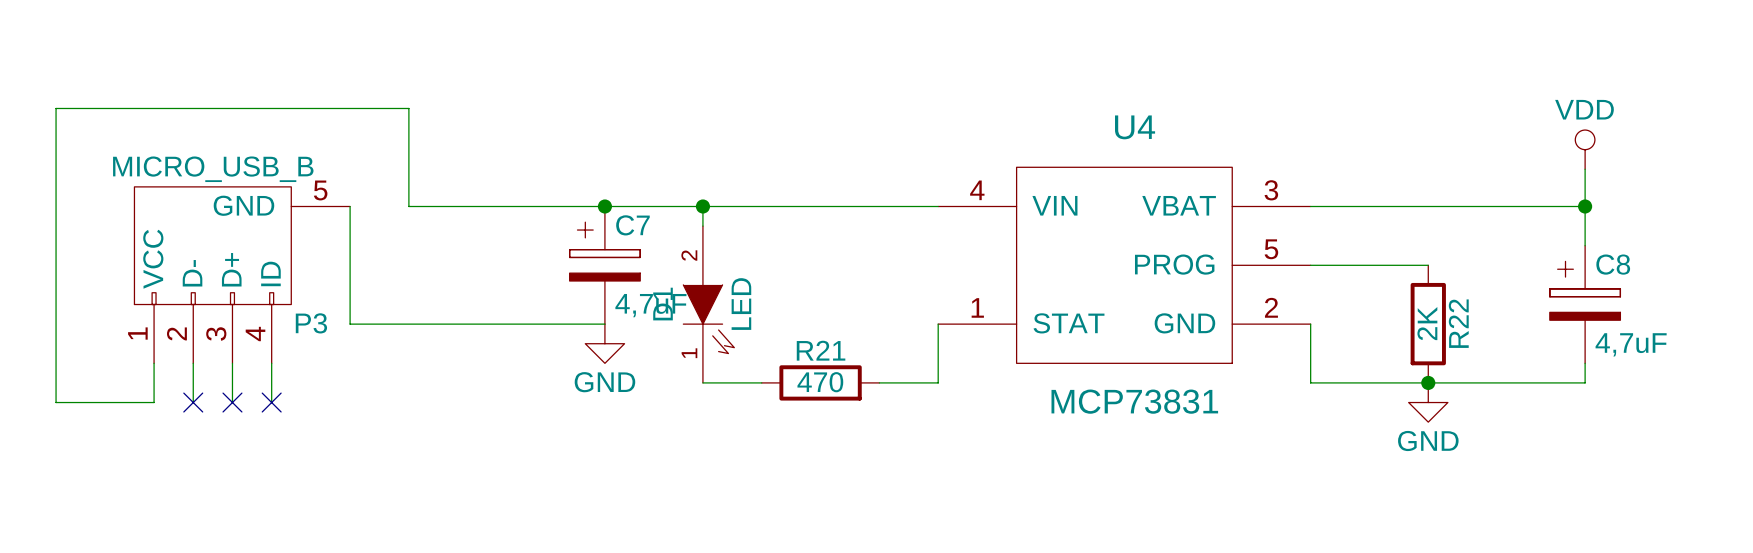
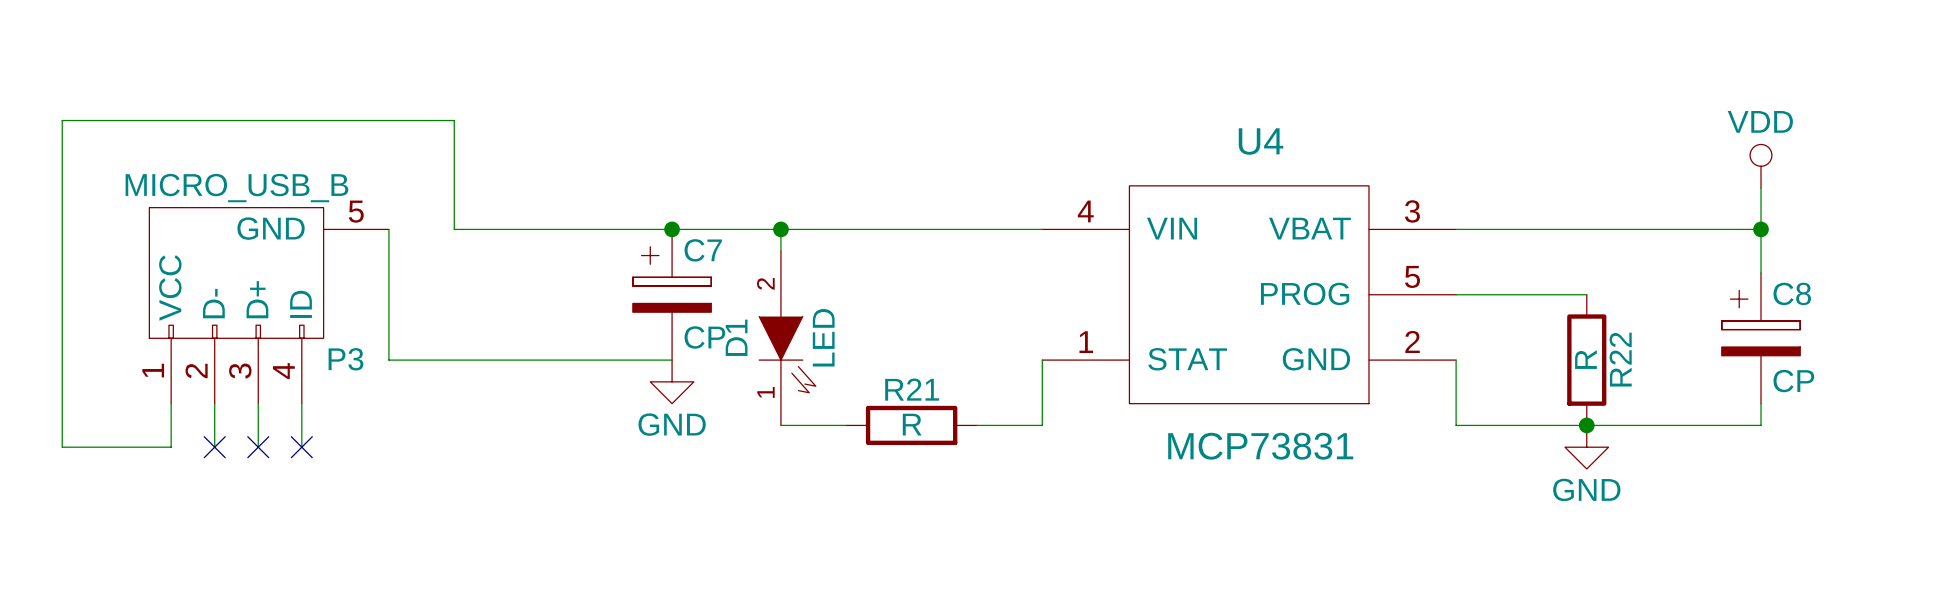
C7 value: 4,7uF (650, 305) -> CP (704, 337)
R22 value: 2K (1427, 323) -> R (1585, 359)
C8 value: 4,7uF (1631, 344) -> CP (1793, 381)
R21 value: 470 (820, 382) -> R (912, 424)

